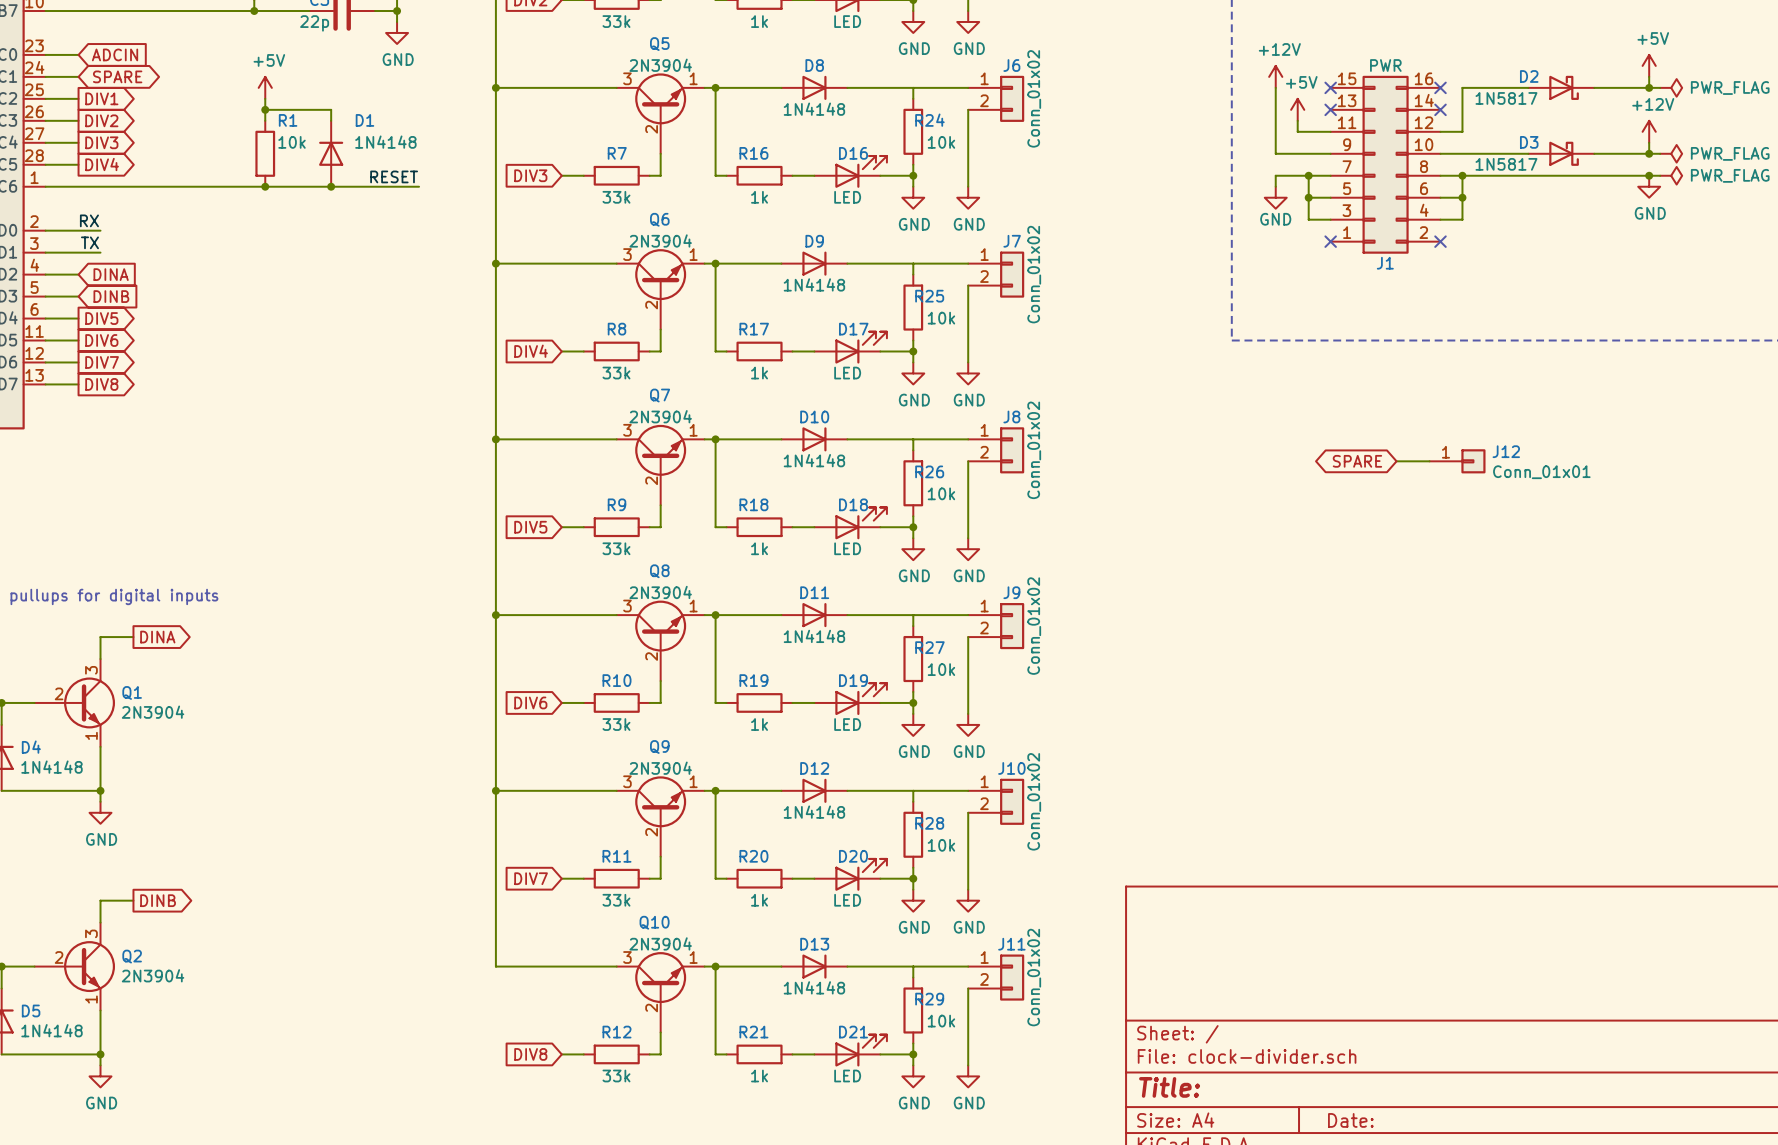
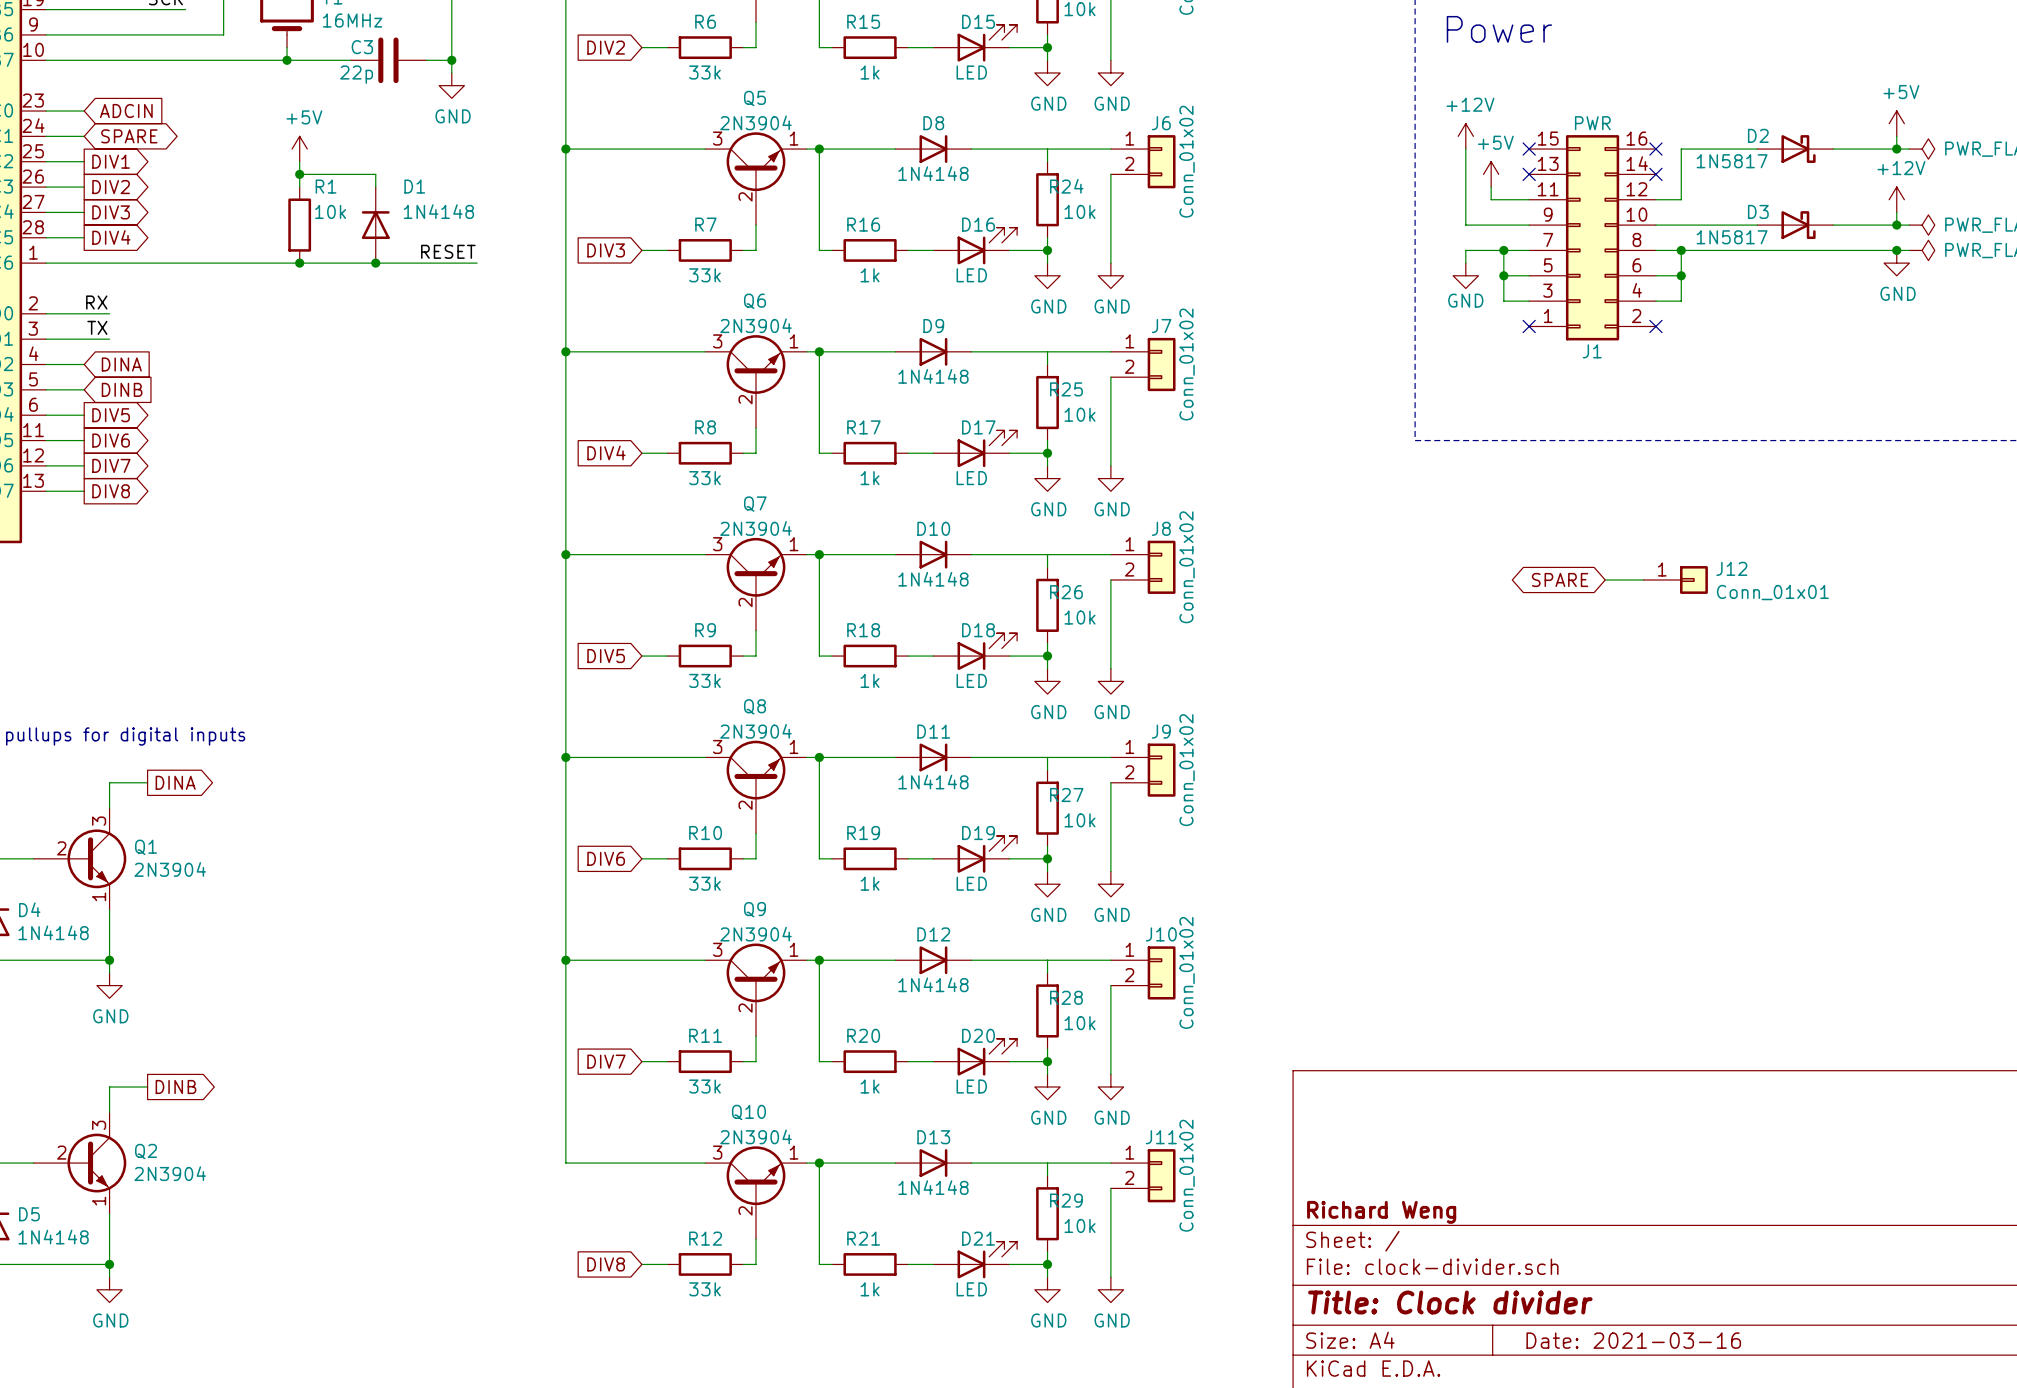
title block: none -> Richard Weng (1381, 1212)
title block: Title: (1169, 1087) -> Title: Clock divider (1450, 1302)
title block: Date: (1350, 1120) -> Date: 2021-03-16 (1633, 1340)

